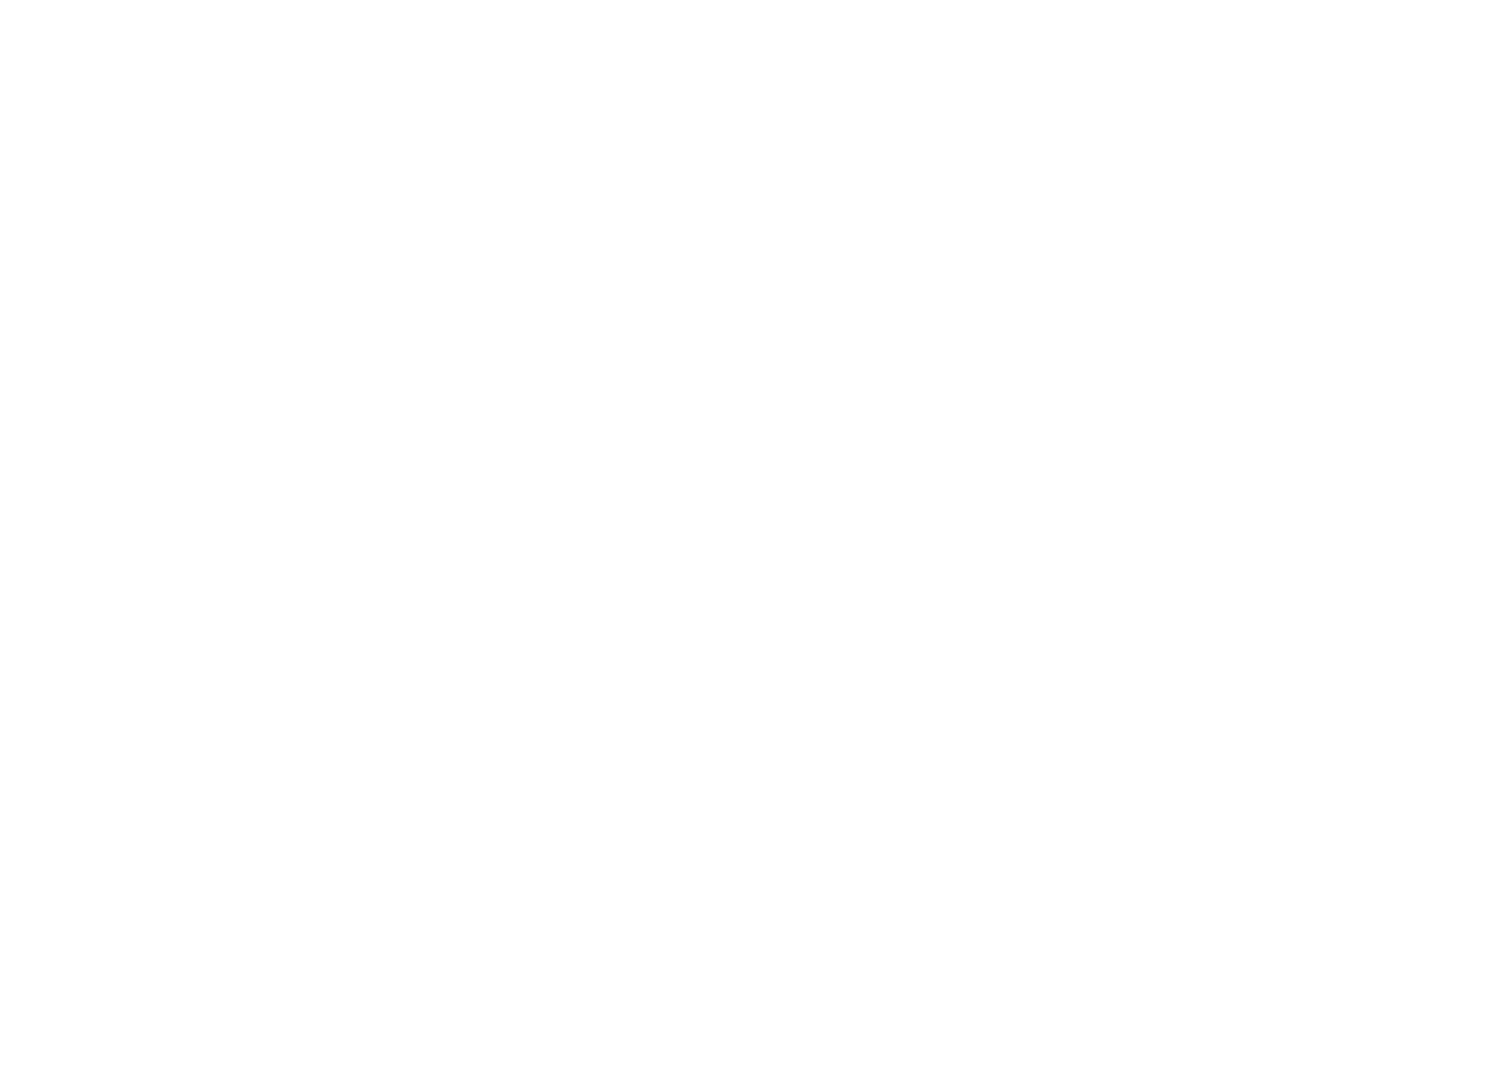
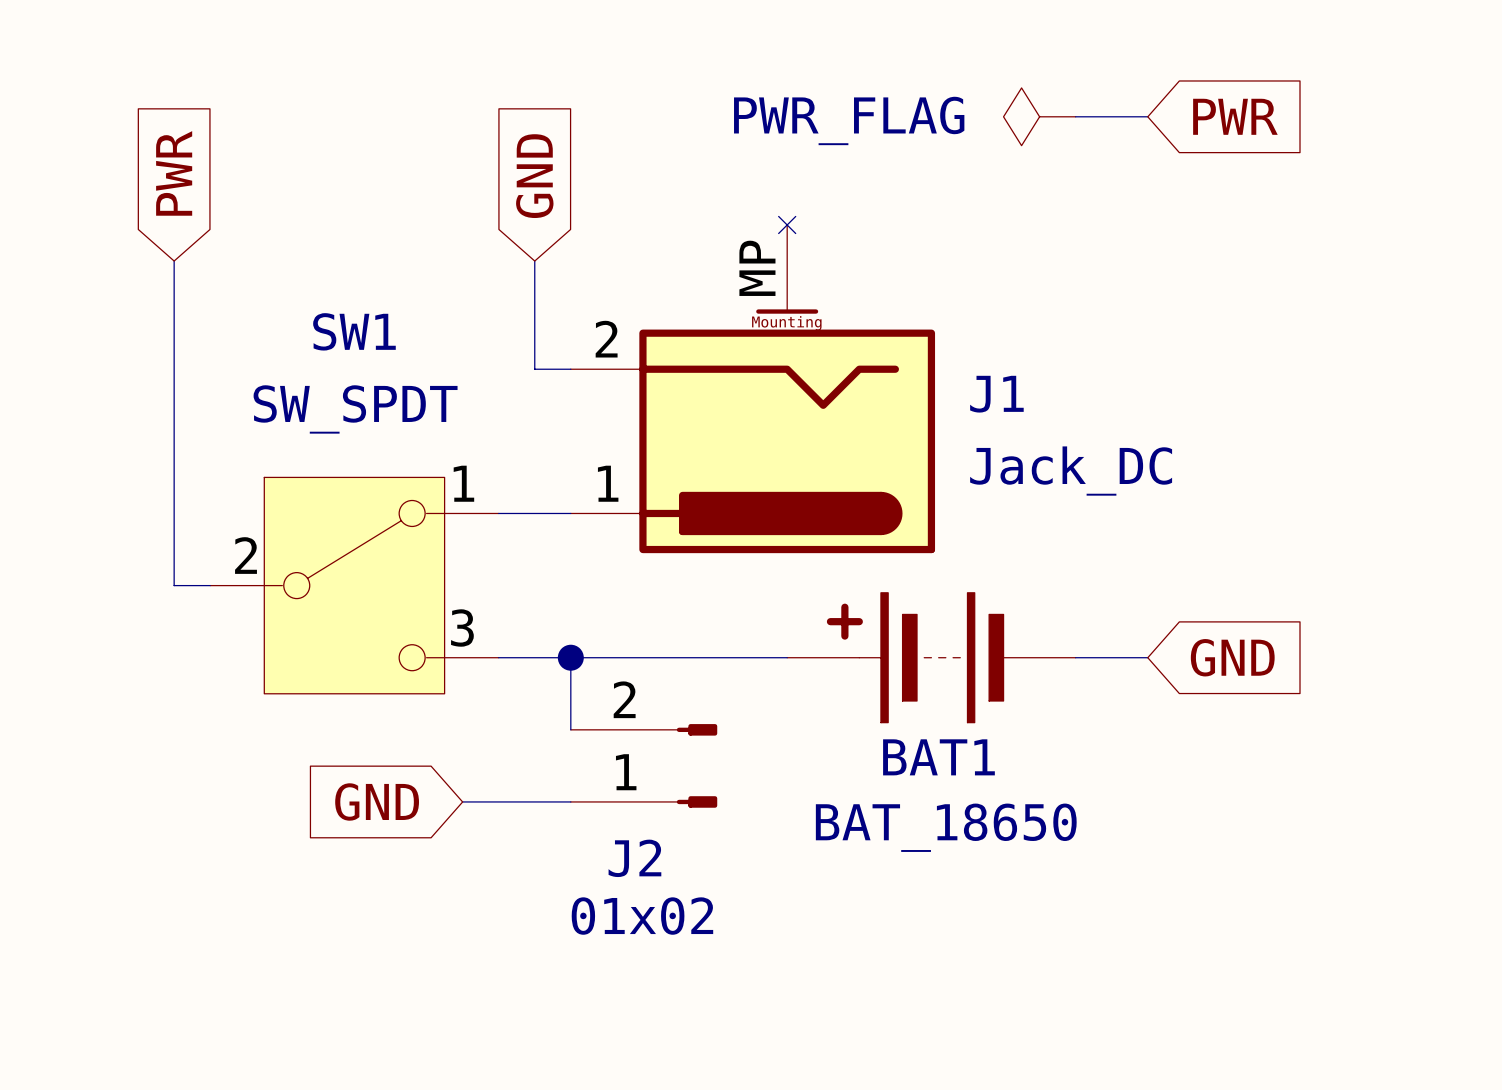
power symbol: none -> PWR_FLAG (1039, 116)
wire: none -> (1075, 116) (1147, 116)
global label: none -> PWR (1235, 116)
global label: none -> PWR (174, 173)
global label: none -> GND (534, 176)
wire: none -> (174, 261) (174, 585) (210, 585)
wire: none -> (534, 261) (534, 369) (570, 369)
J1: none -> Jack_DC (752, 384)
wire: none -> (498, 513) (570, 513)
SW1: none -> SW_SPDT (354, 585)
wire: none -> (498, 657) (787, 657)
wire: none -> (570, 657) (570, 729)
junction: none -> (570, 657)
BAT1: none -> BAT_18650 (931, 657)
wire: none -> (1075, 657) (1147, 657)
global label: none -> GND (1232, 657)
J2: none -> 01x02 (644, 765)
global label: none -> GND (377, 801)
wire: none -> (462, 801) (570, 801)

